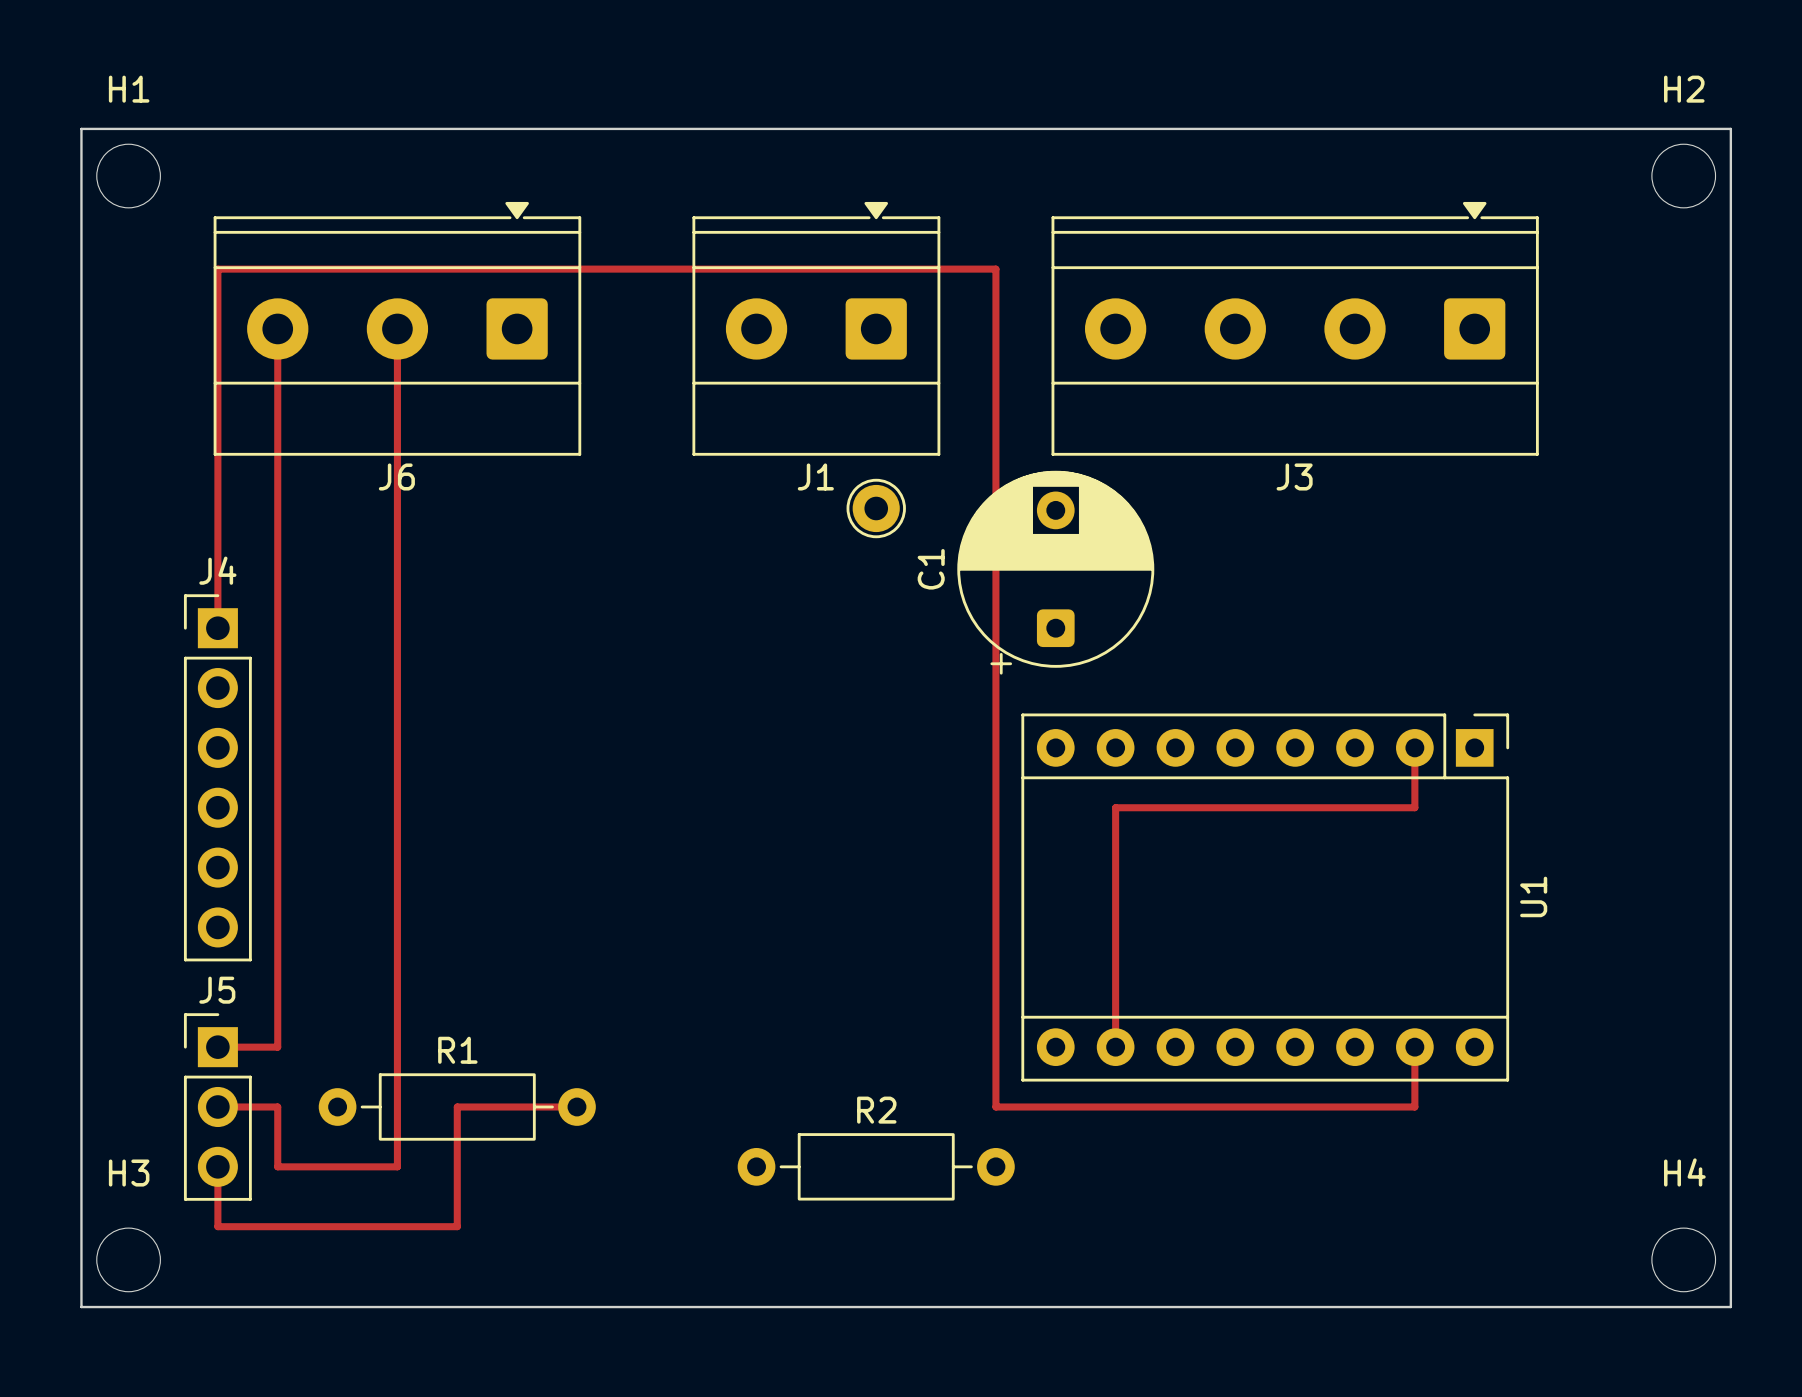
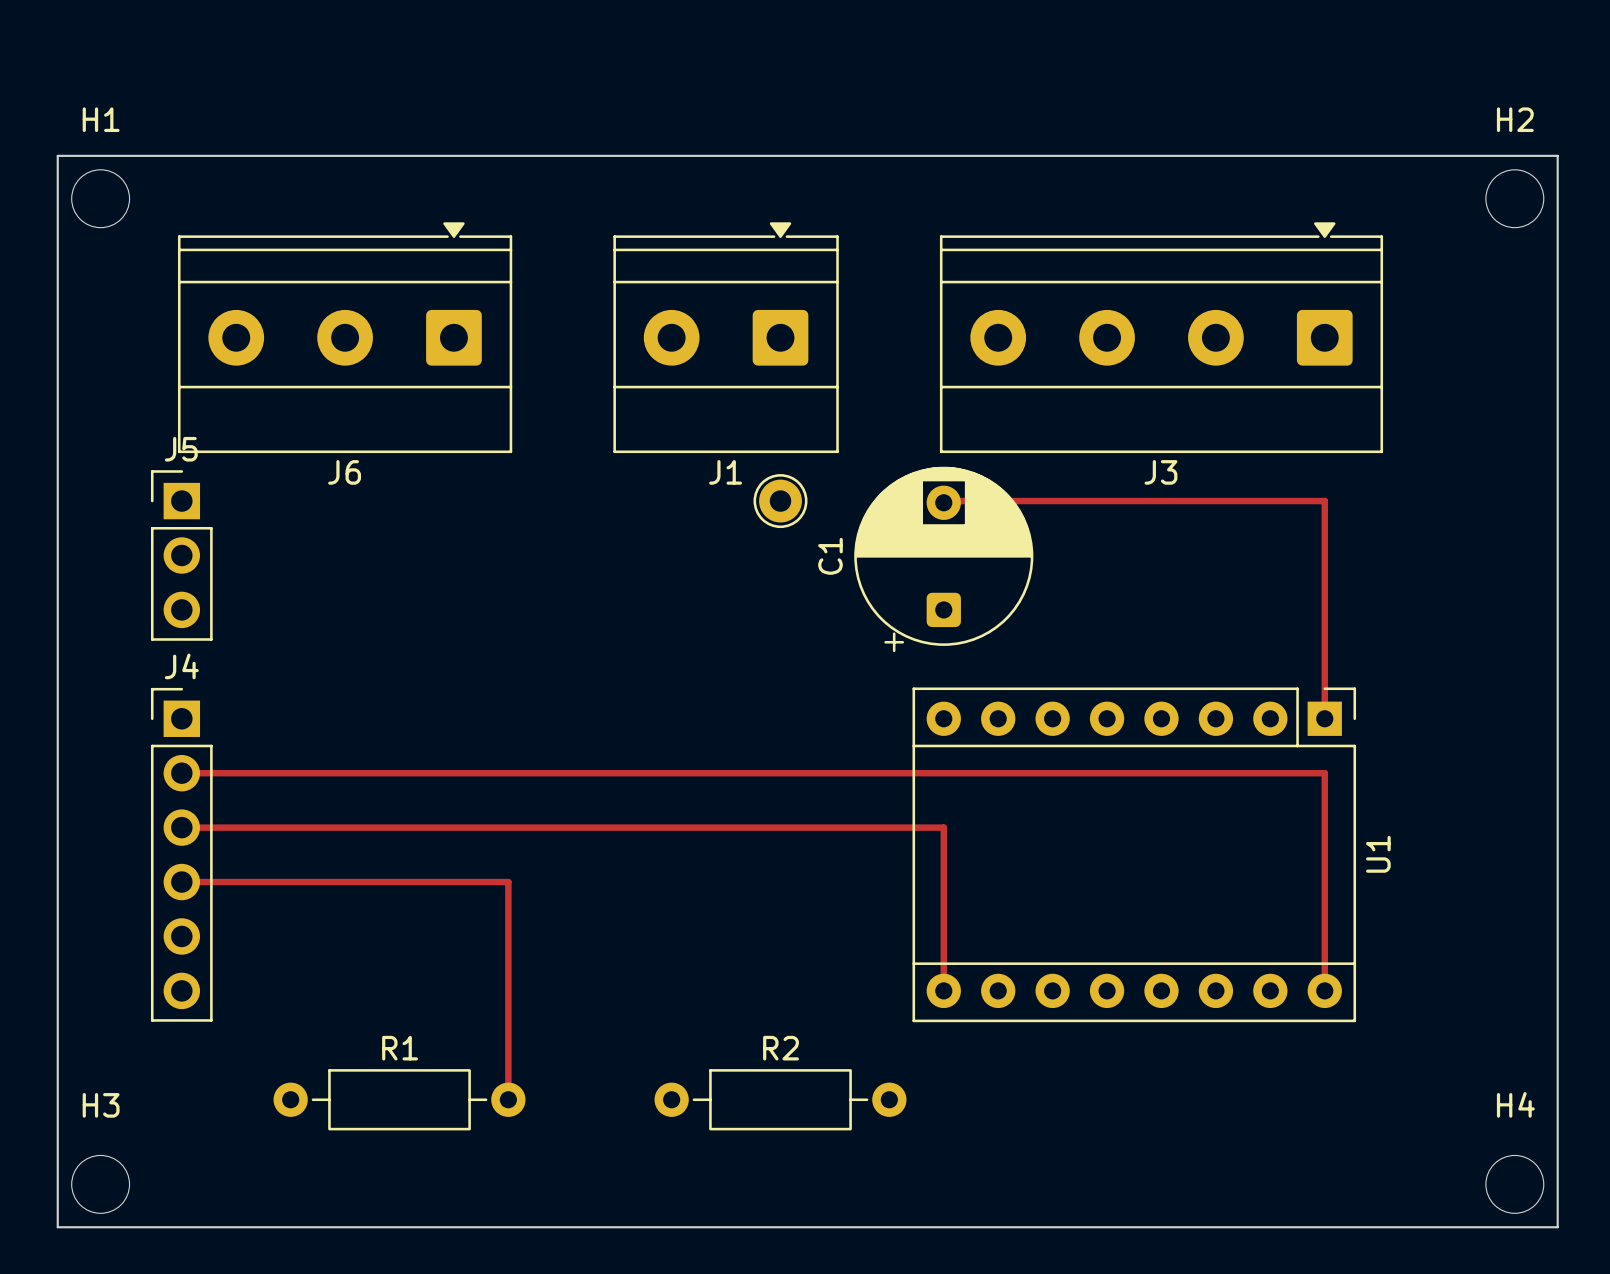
track: (277, 328) (277, 1047) (217, 1047) -> none
track: (397, 328) (397, 1166) (277, 1166) (277, 1106) (217, 1106) -> none
track: none -> (943, 501) (1324, 501) (1324, 718)
track: (217, 628) (217, 269) (995, 269) (995, 1106) (1414, 1106) (1414, 1047) -> none
track: (1414, 747) (1414, 807) -> (1324, 990) (1324, 773) (1270, 773)
J4 position: (217, 777) -> (181, 854)
track: (1115, 807) (1115, 1047) -> (998, 773) (181, 773)
track: none -> (181, 827) (943, 827) (943, 990)
track: none -> (181, 882) (508, 882) (508, 1099)
J5 position: (217, 1106) -> (181, 555)
R1 position: (457, 1106) -> (399, 1099)
track: (576, 1106) (457, 1106) (457, 1226) (217, 1226) (217, 1166) -> none

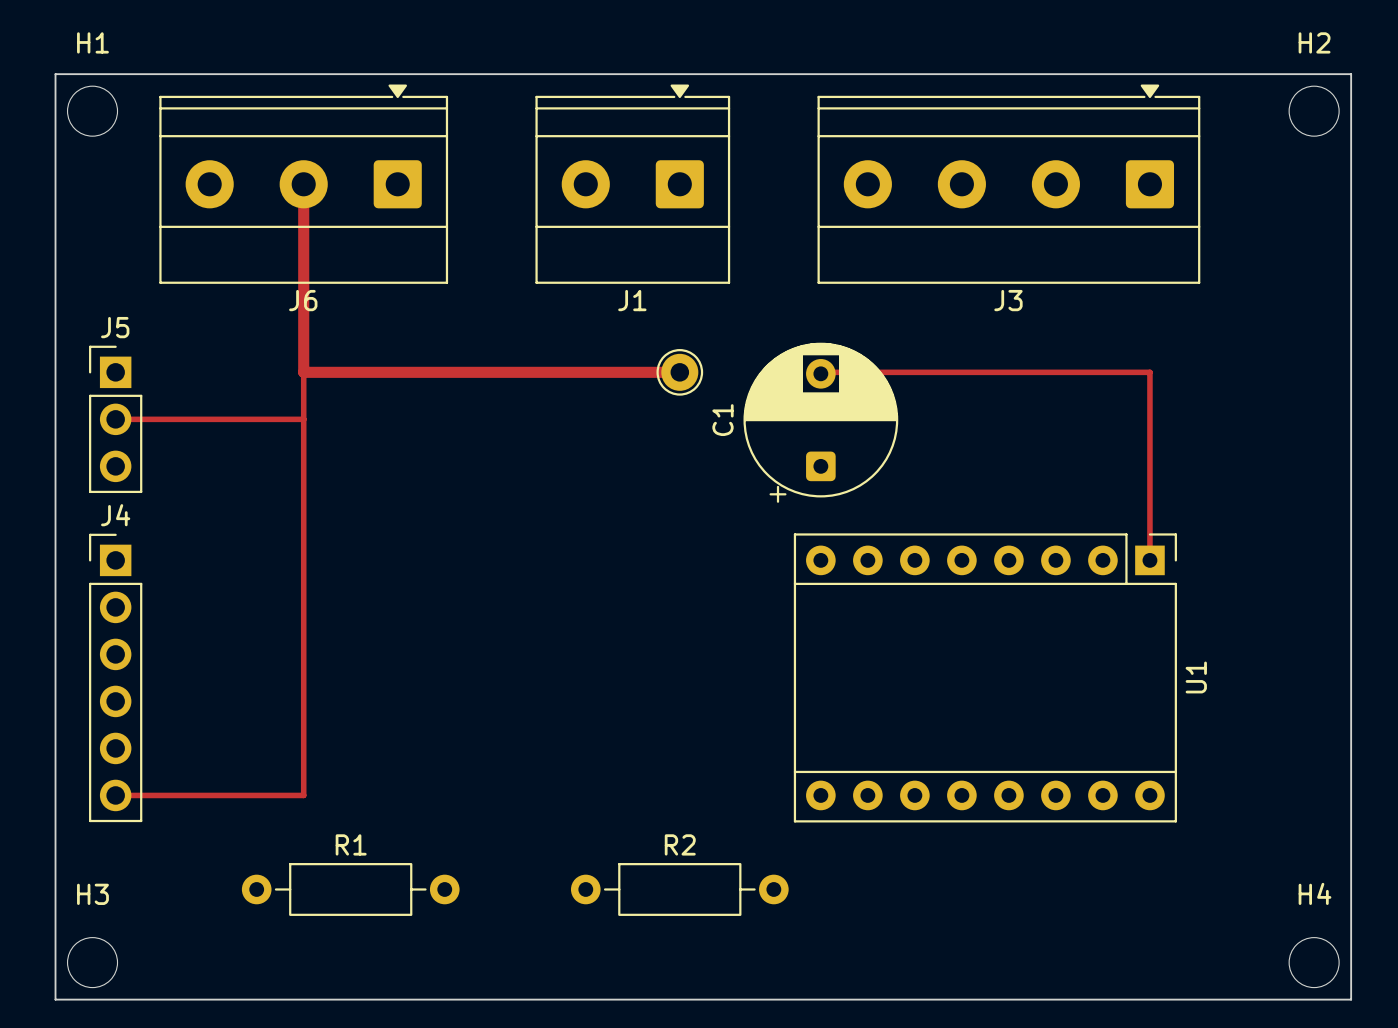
track: none -> (303, 184) (303, 372)
J6 position: (345, 337) -> (303, 184)
J1 position: (726, 337) -> (632, 184)
J3 position: (1161, 337) -> (1008, 184)
track: none -> (303, 372) (303, 795) (115, 795)
track: none -> (303, 372) (679, 372)
track: none -> (115, 419) (303, 419)
J5 position: (181, 555) -> (115, 419)
track: (181, 773) (1324, 773) (1324, 990) -> none
track: (181, 827) (943, 827) (943, 990) -> none
J4 position: (181, 854) -> (115, 677)
track: (181, 882) (508, 882) (508, 1099) -> none

